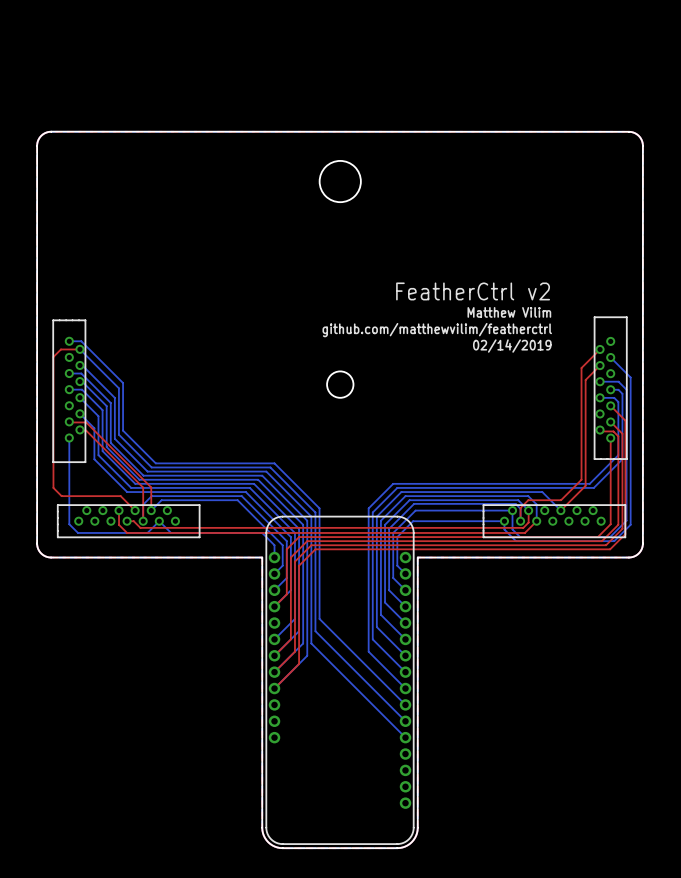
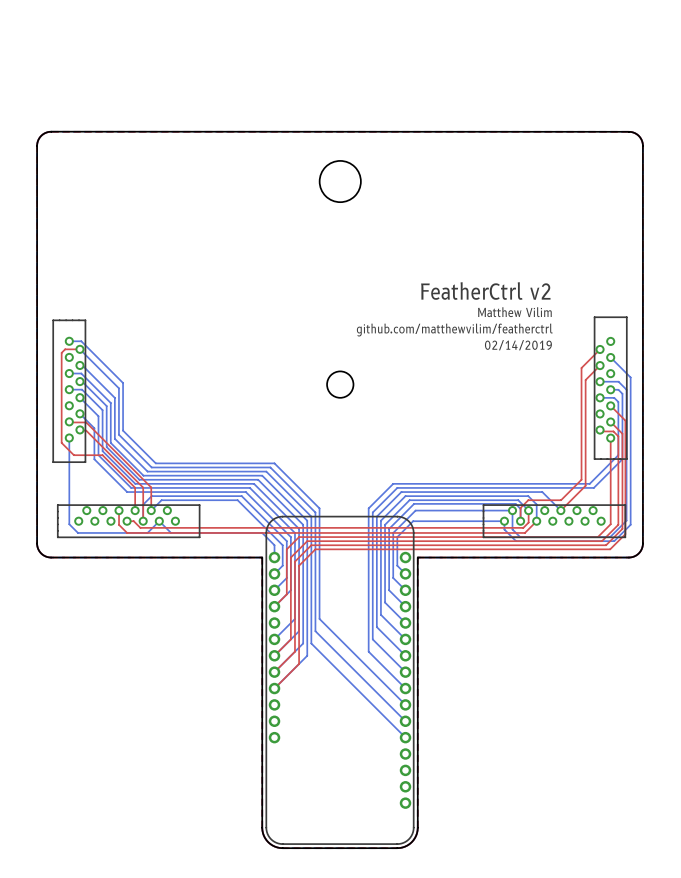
top track: (79, 349) (60, 349) (53, 356) (53, 487) (61, 496) (120, 496) (135, 510) -> (79, 349) (65, 349) (61, 352) (61, 442) (73, 455) (102, 455) (135, 487) (135, 510)

